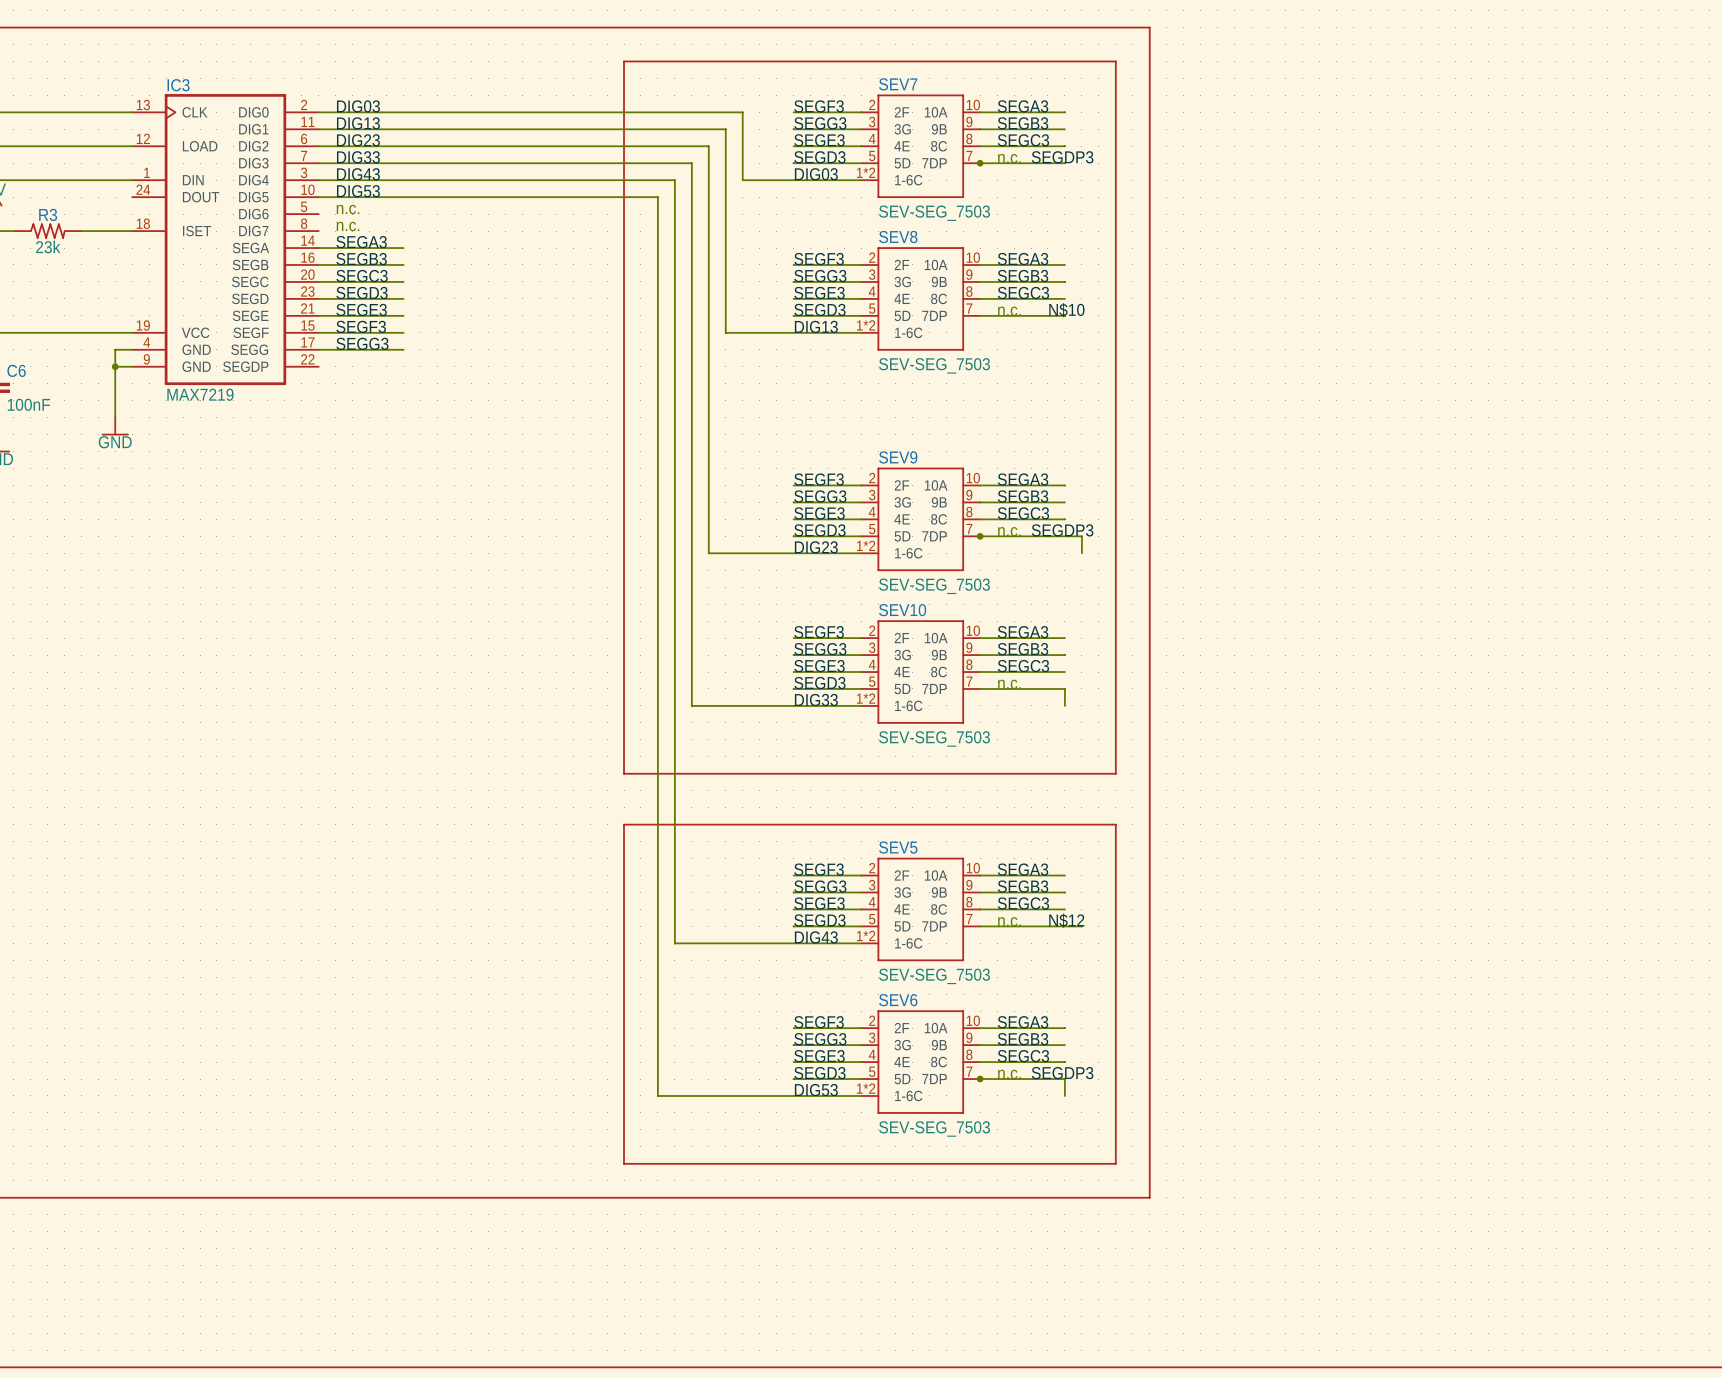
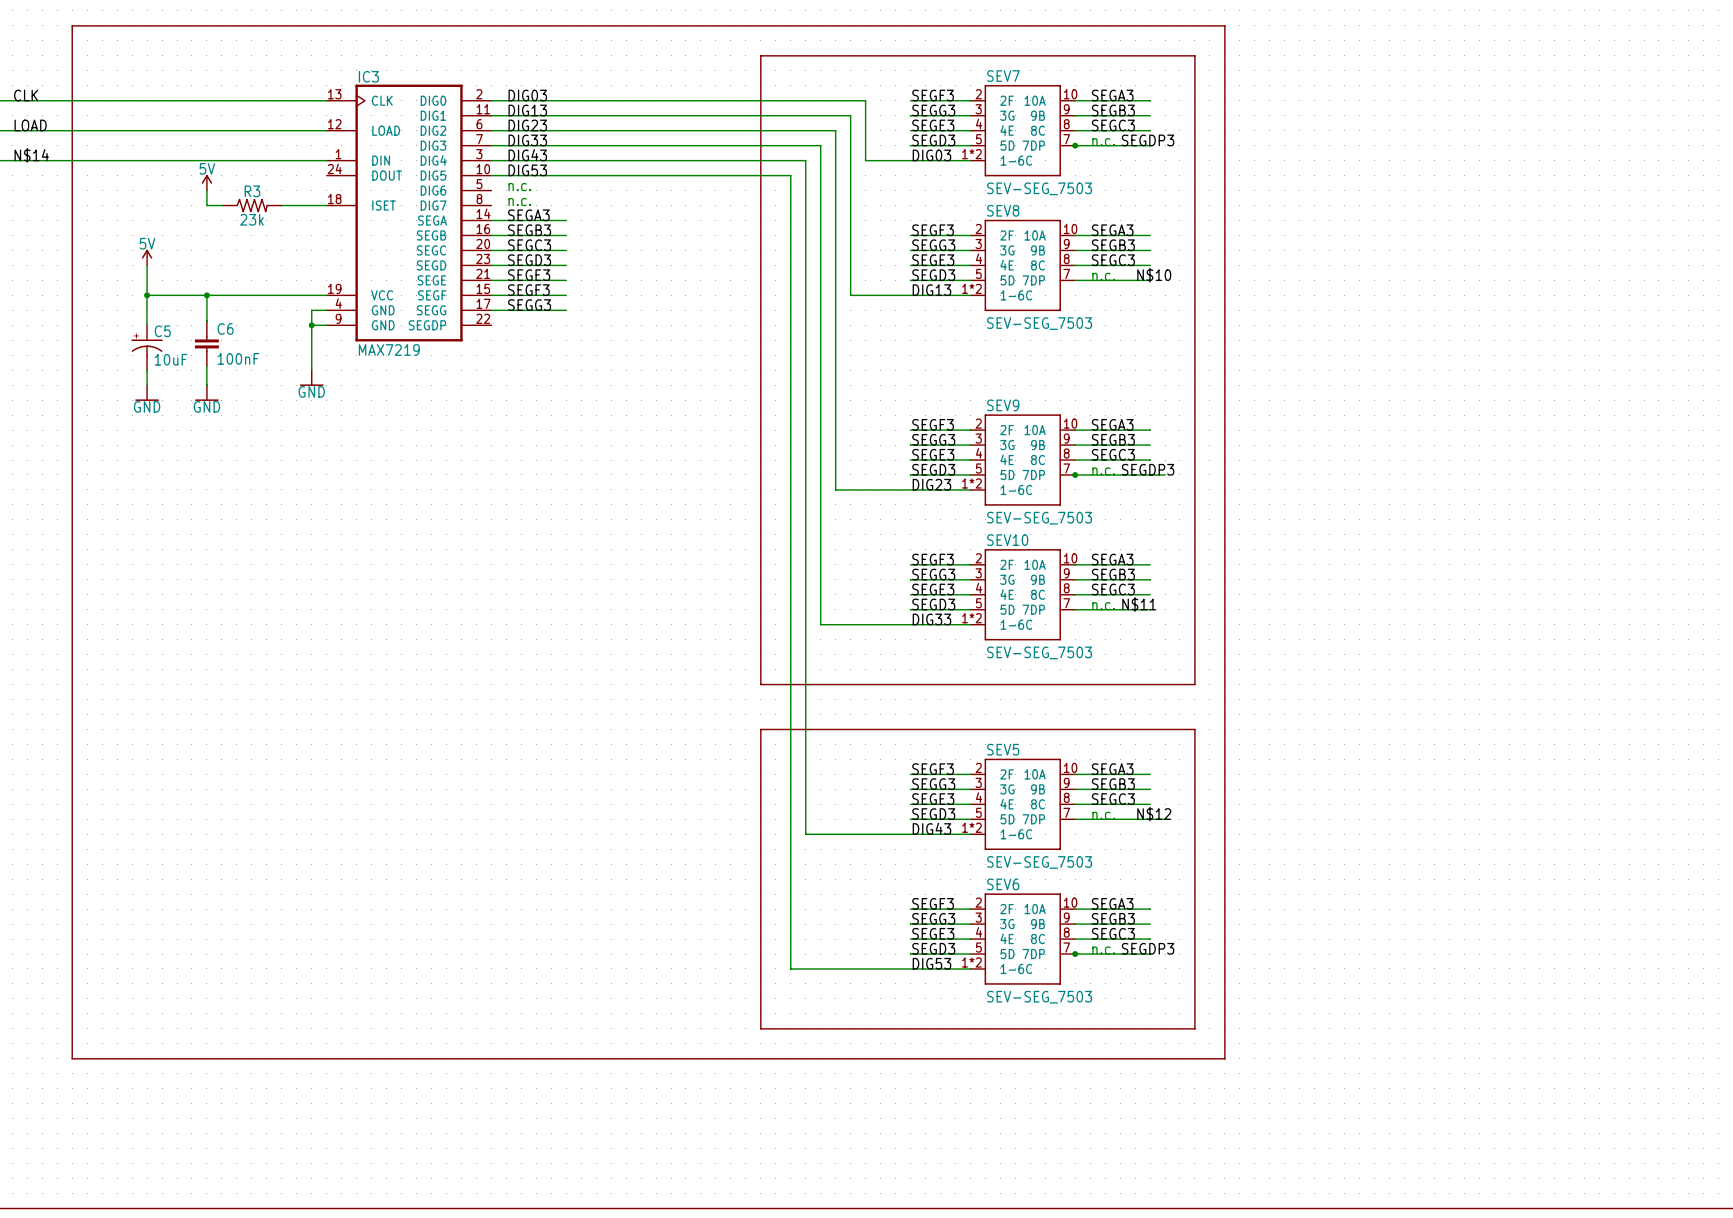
wire: (1081, 536) (1081, 553) -> none
label: none -> N$11 (1139, 604)
wire: (1064, 688) (1064, 705) -> none
wire: (1064, 1079) (1064, 1095) -> none

